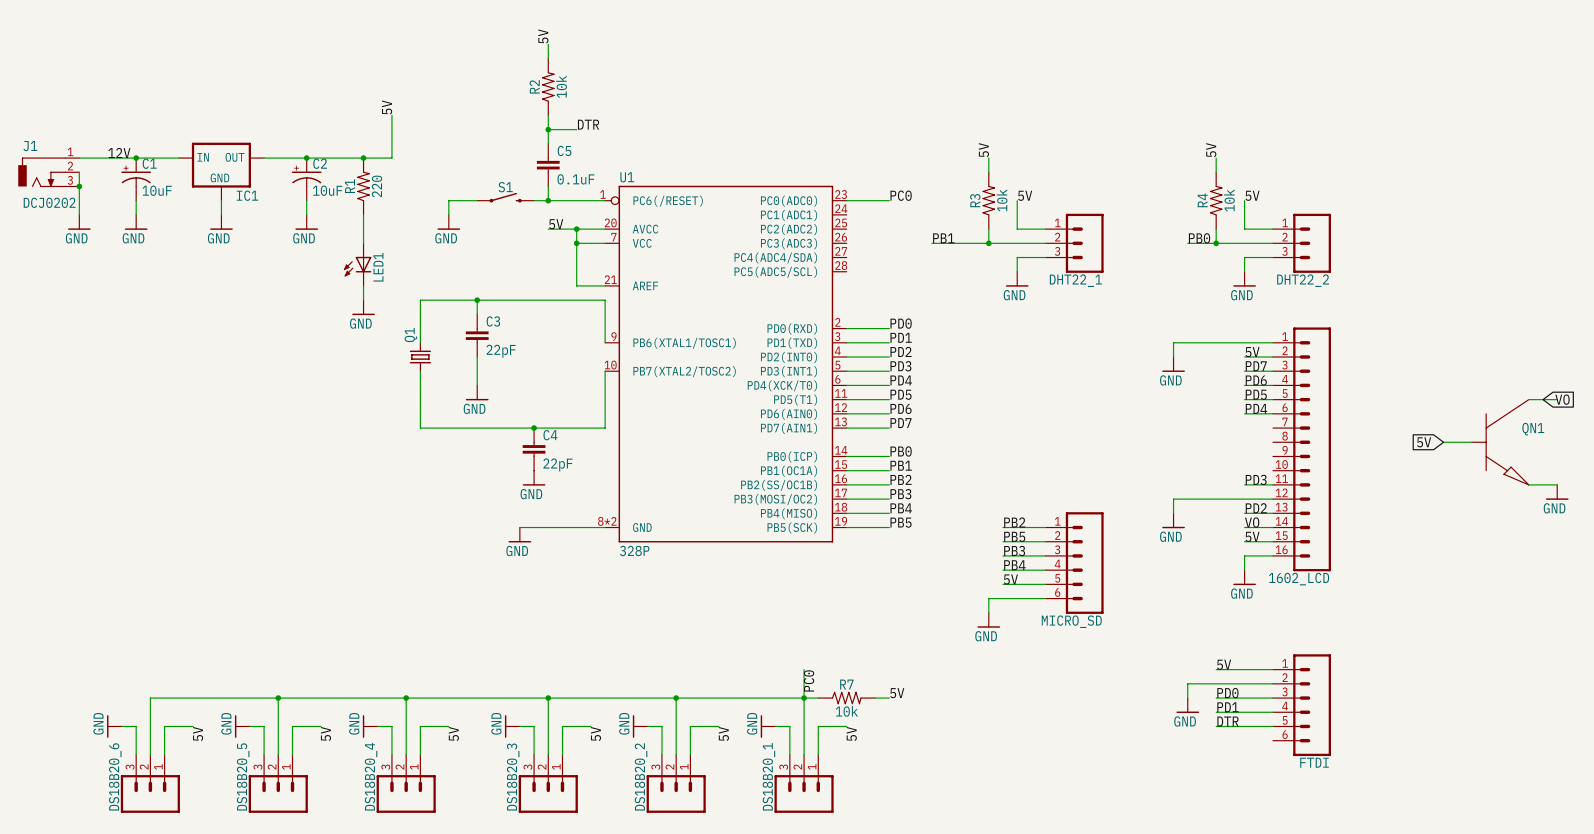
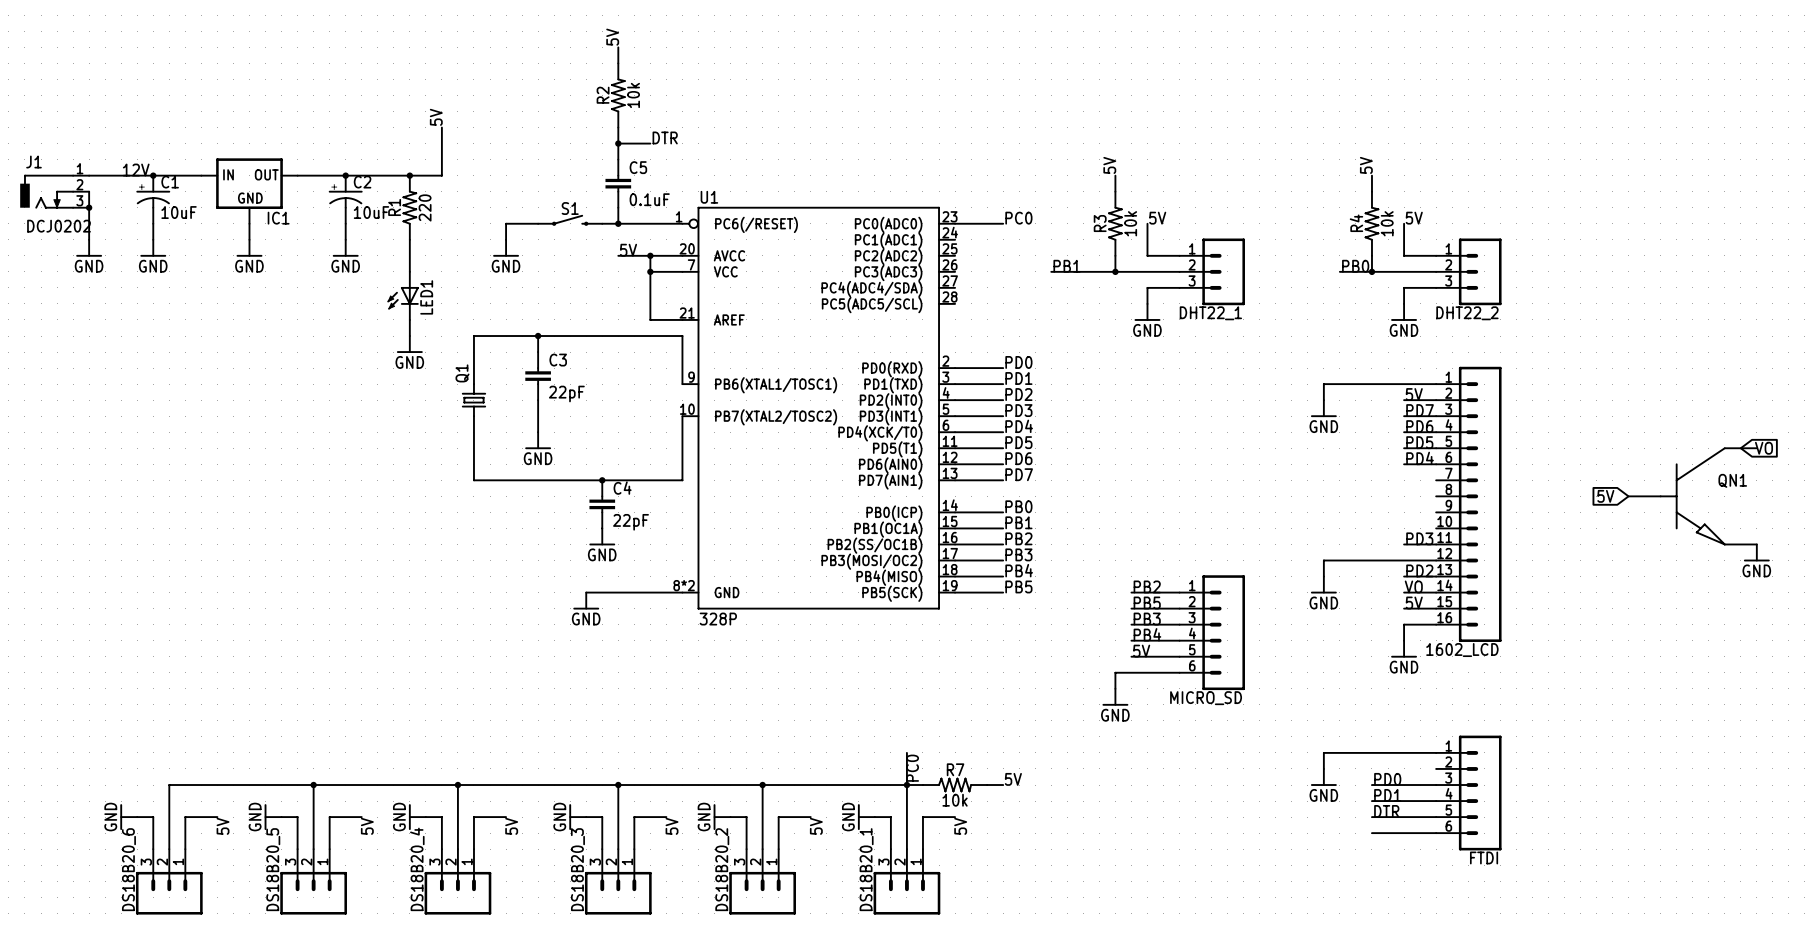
label: 5V (1224, 664) -> none
wire: none -> (1371, 752) (1323, 752) (1323, 768)
wire: (1273, 683) (1187, 683) (1187, 698) -> none
power symbol position: GND (1187, 705) -> GND (1323, 777)
wire: none -> (1371, 833) (1436, 833)

